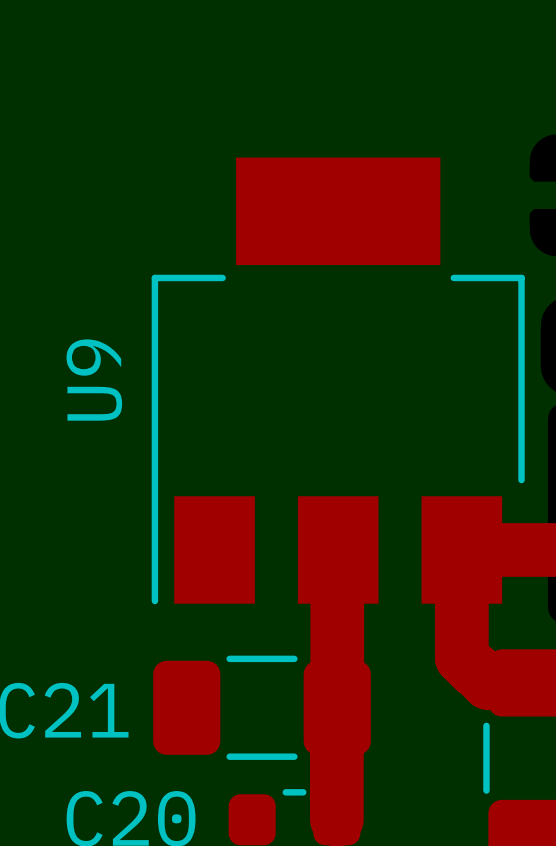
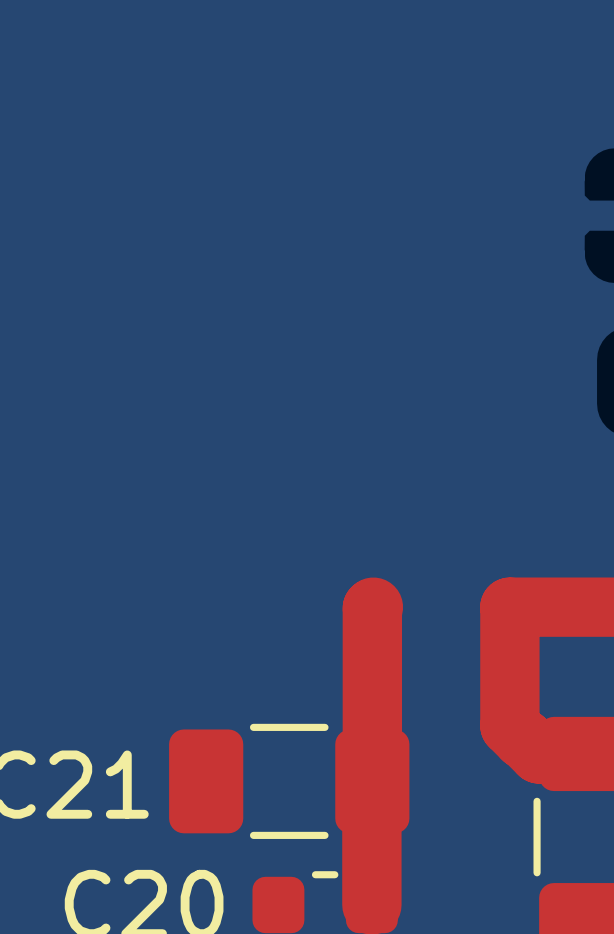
U9: (338, 380) -> none

